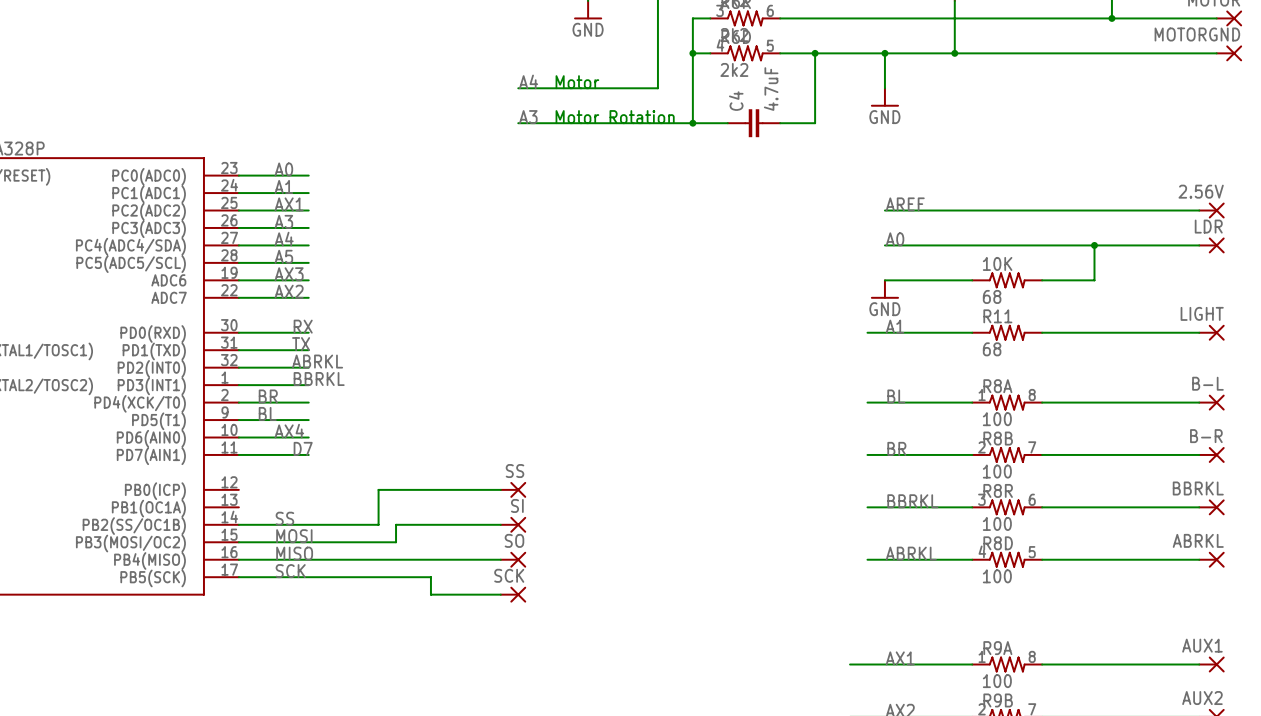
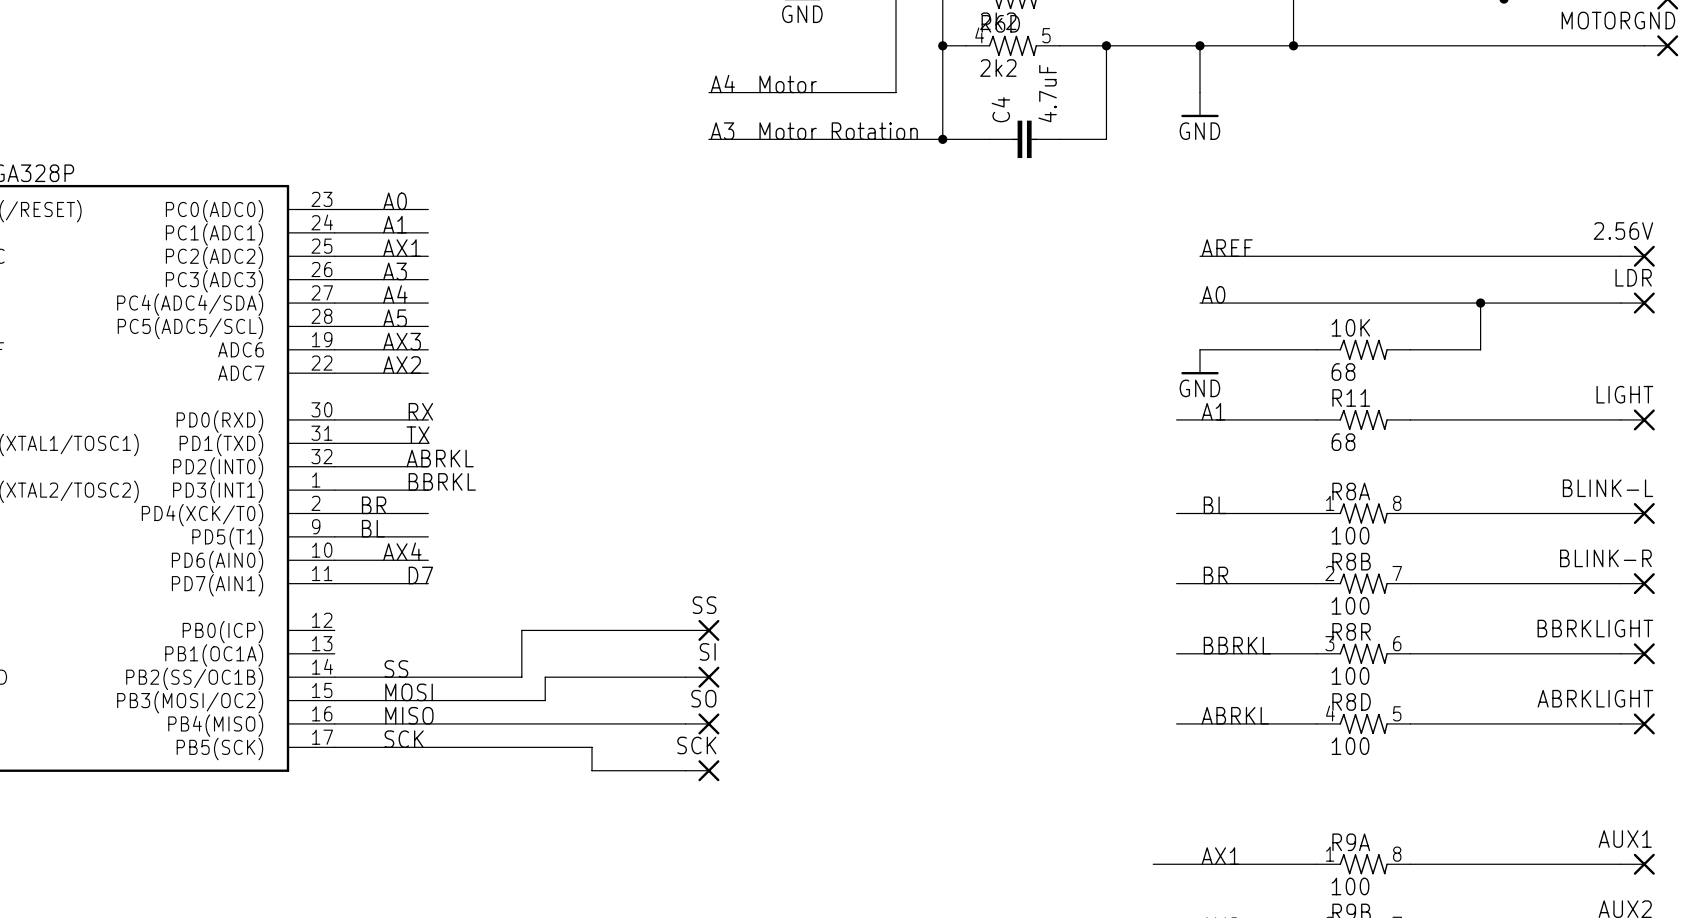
B-L name: B-L (1207, 383) -> BLINK-L (1608, 488)
B-R name: B-R (1206, 436) -> BLINK-R (1605, 558)
BBRKL name: BBRKL (1198, 488) -> BBRKLIGHT (1595, 628)
ABRKL name: ABRKL (1198, 540) -> ABRKLIGHT (1595, 698)

